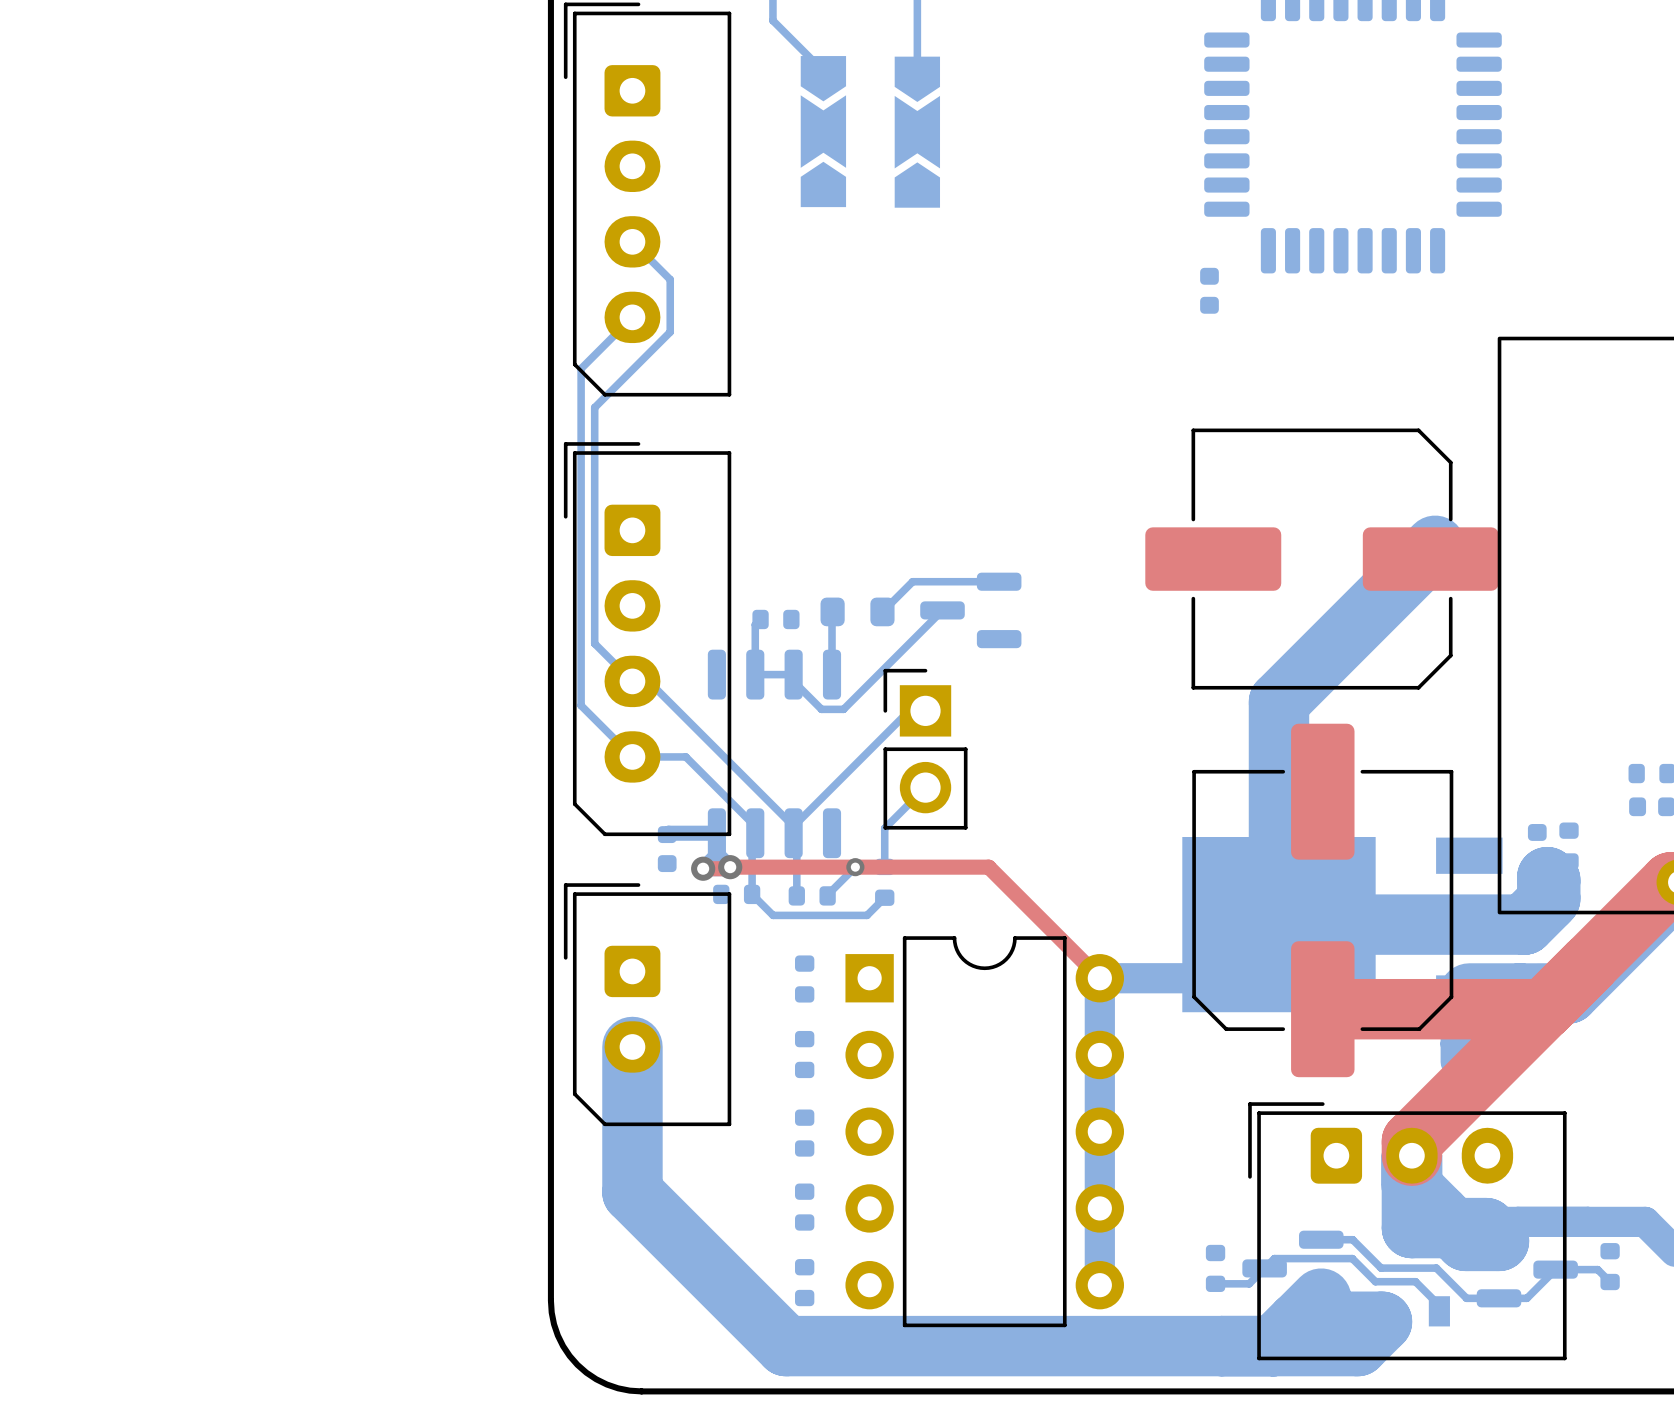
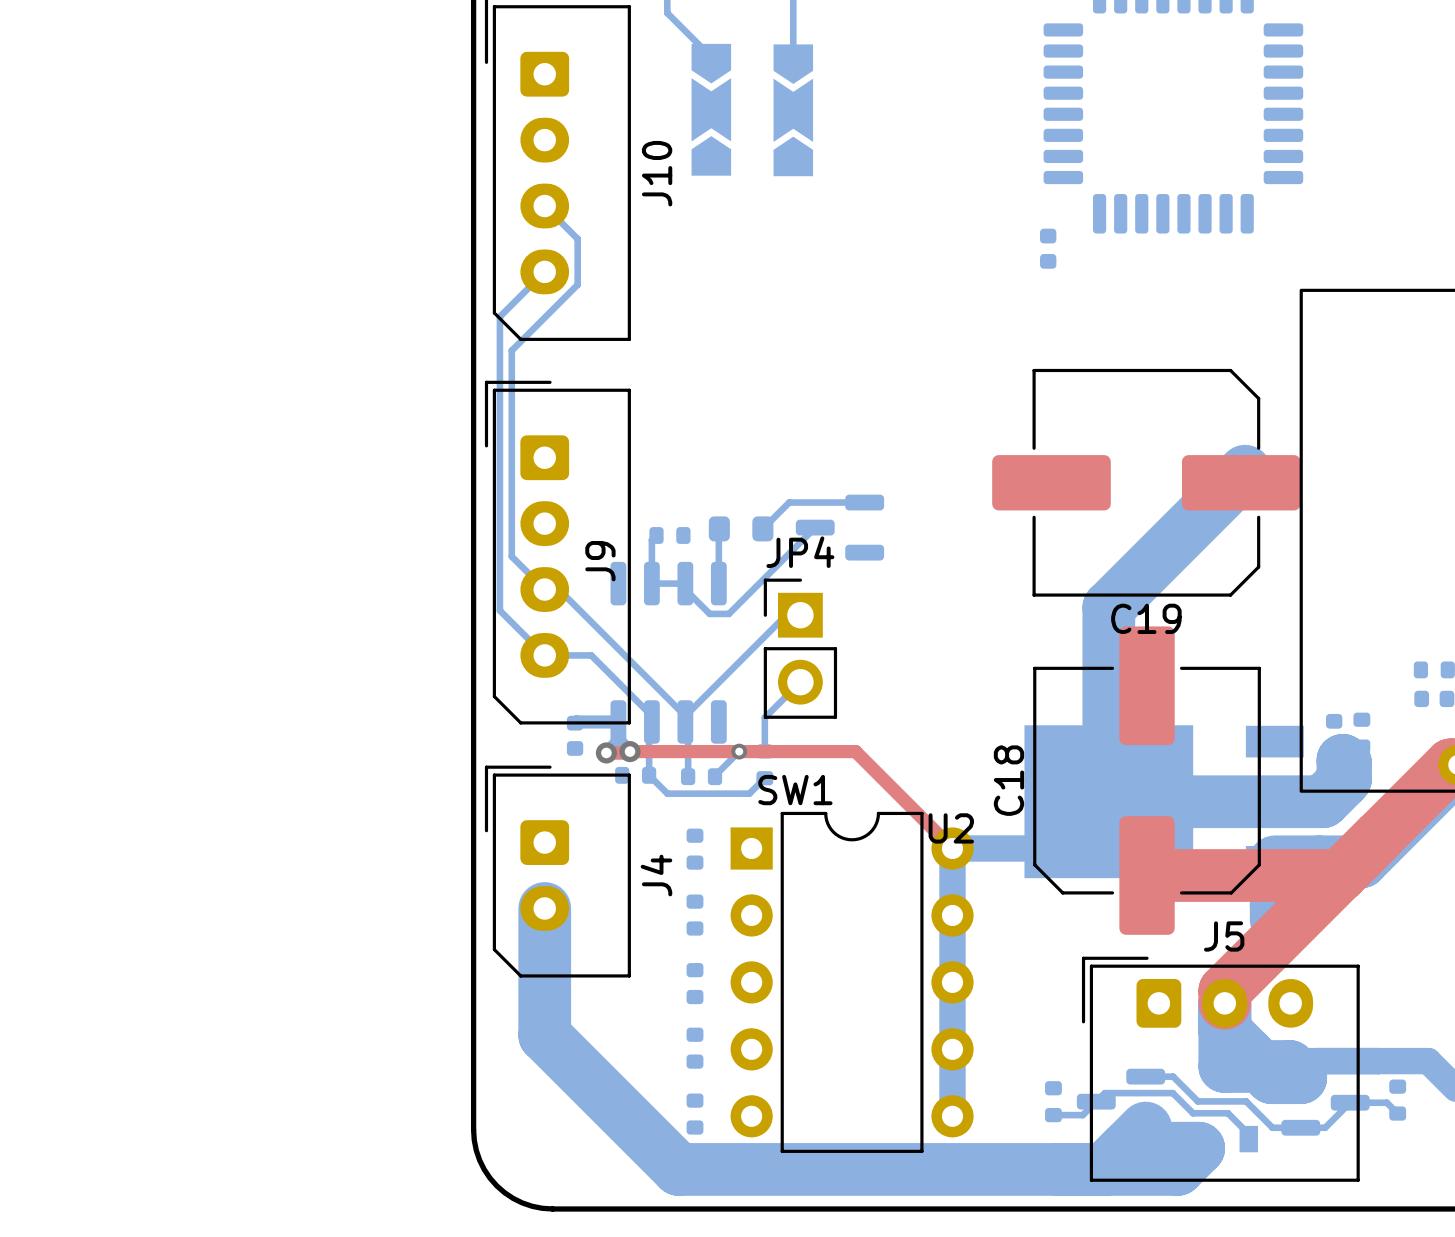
J10 name: none -> J10 (657, 173)
JP4 name: none -> JP4 (800, 552)
J9 name: none -> J9 (600, 561)
C19 name: none -> C19 (1146, 618)
C18 name: none -> C18 (1008, 780)
SW1 name: none -> SW1 (795, 790)
U2 name: none -> U2 (951, 828)
J4 name: none -> J4 (656, 875)
J5 name: none -> J5 (1224, 936)

